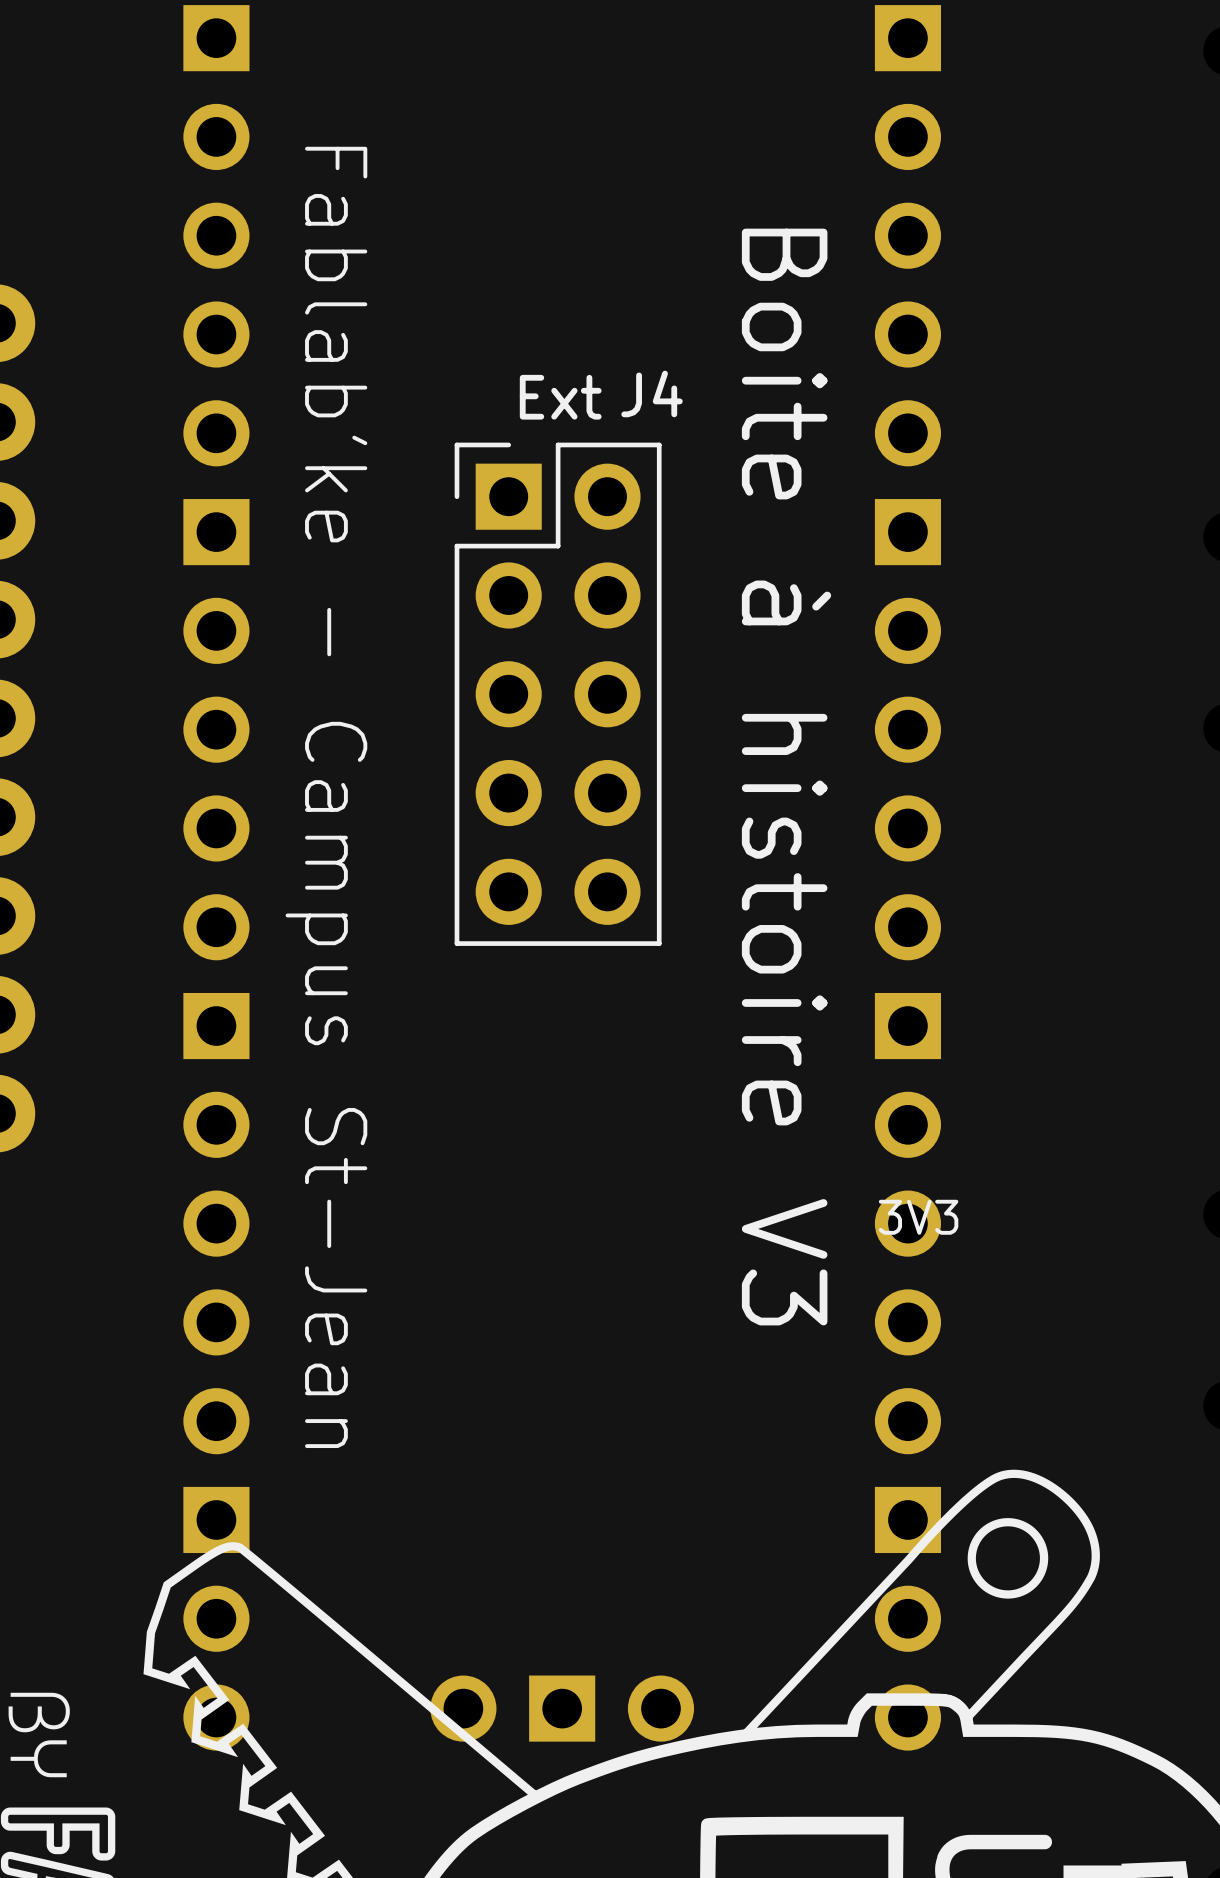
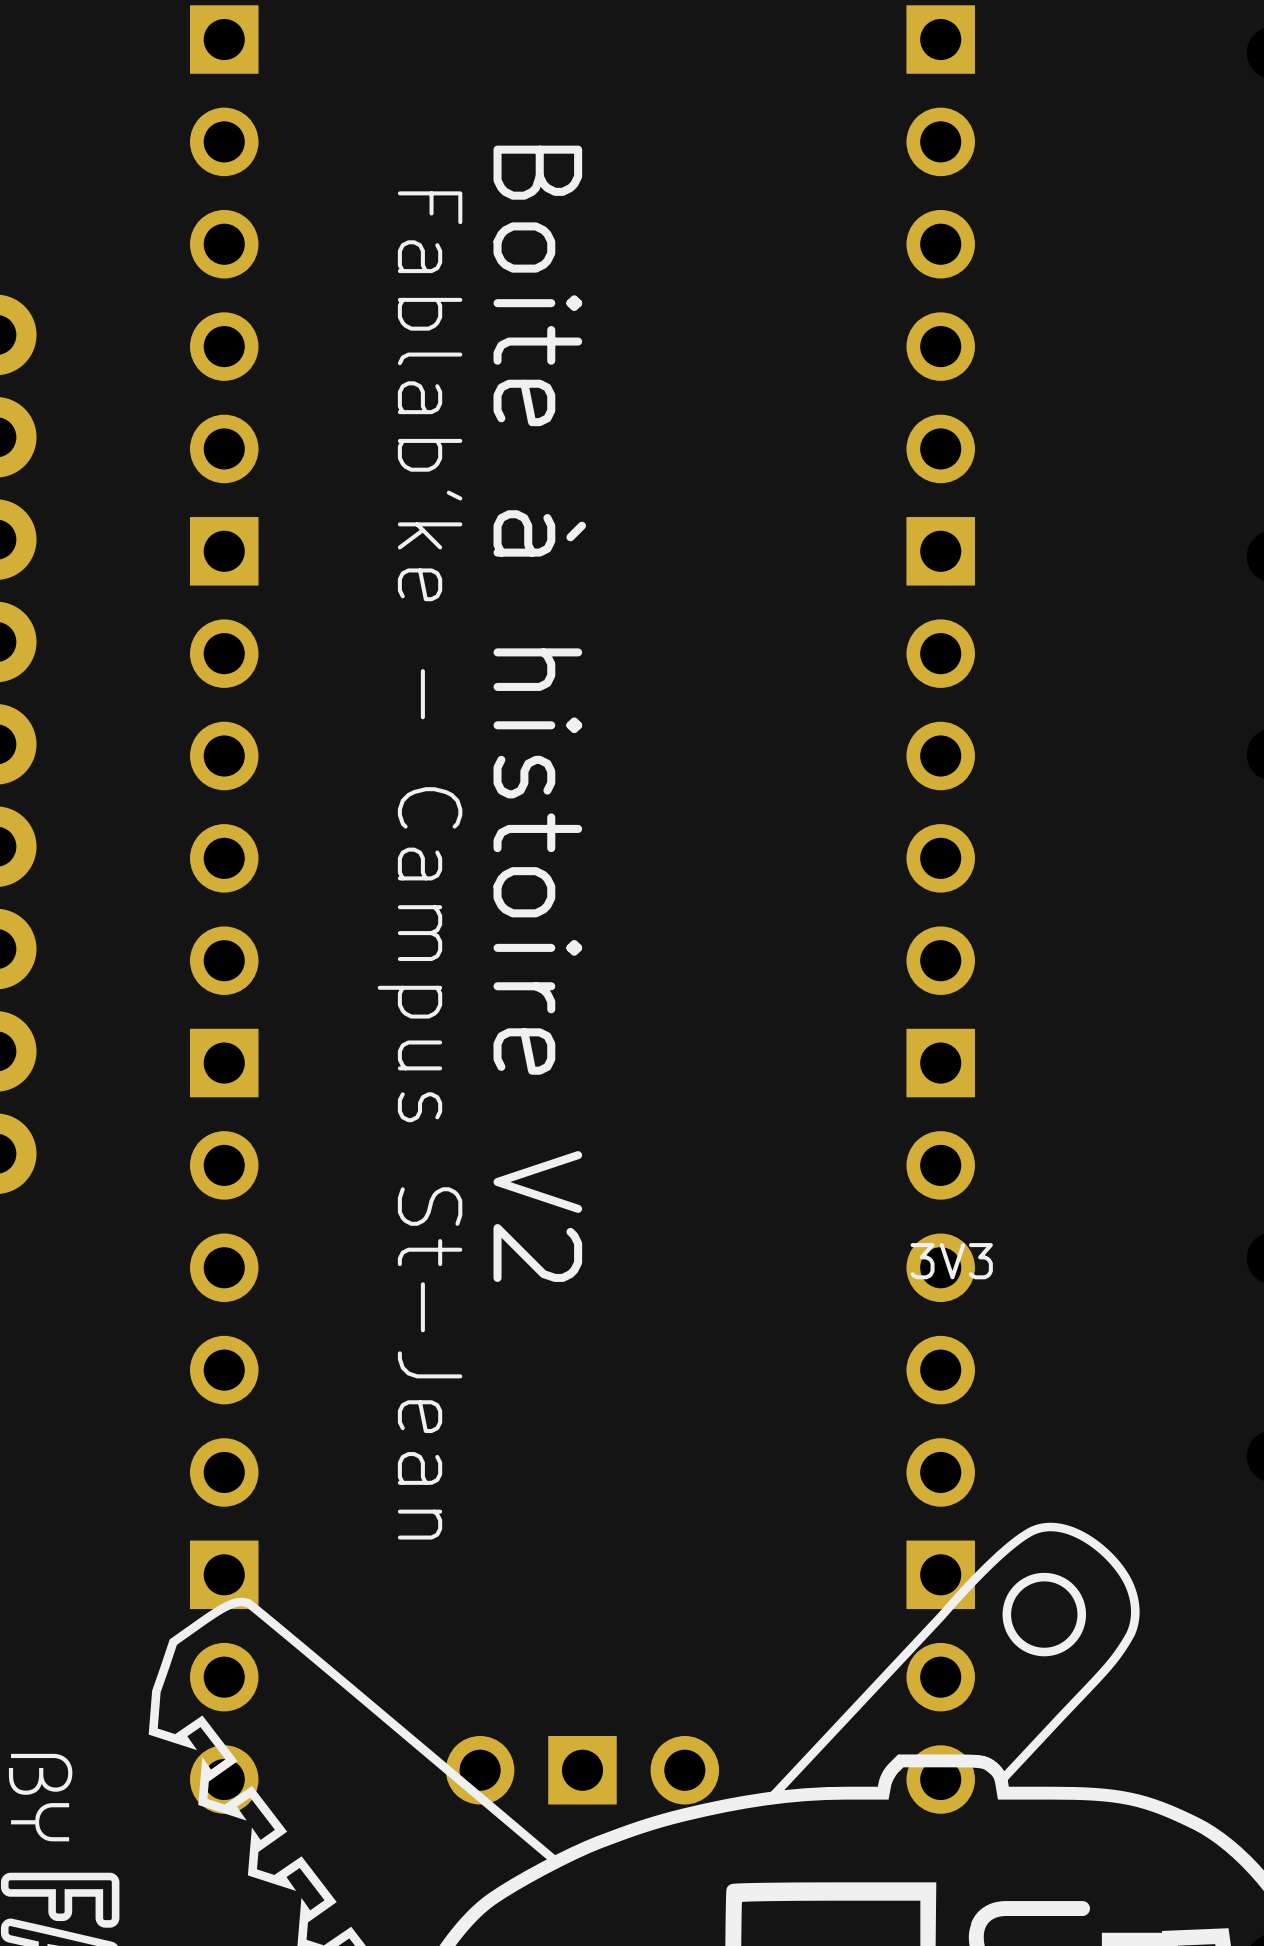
text: none -> Boite à histoire V2 (539, 713)
J4: Ext (558, 694) -> none
text: Boite à histoire V3 (786, 777) -> none
text position: Fablab'ke - Campus St-Jean (326, 797) -> Fablab'ke - Campus St-Jean (420, 865)

